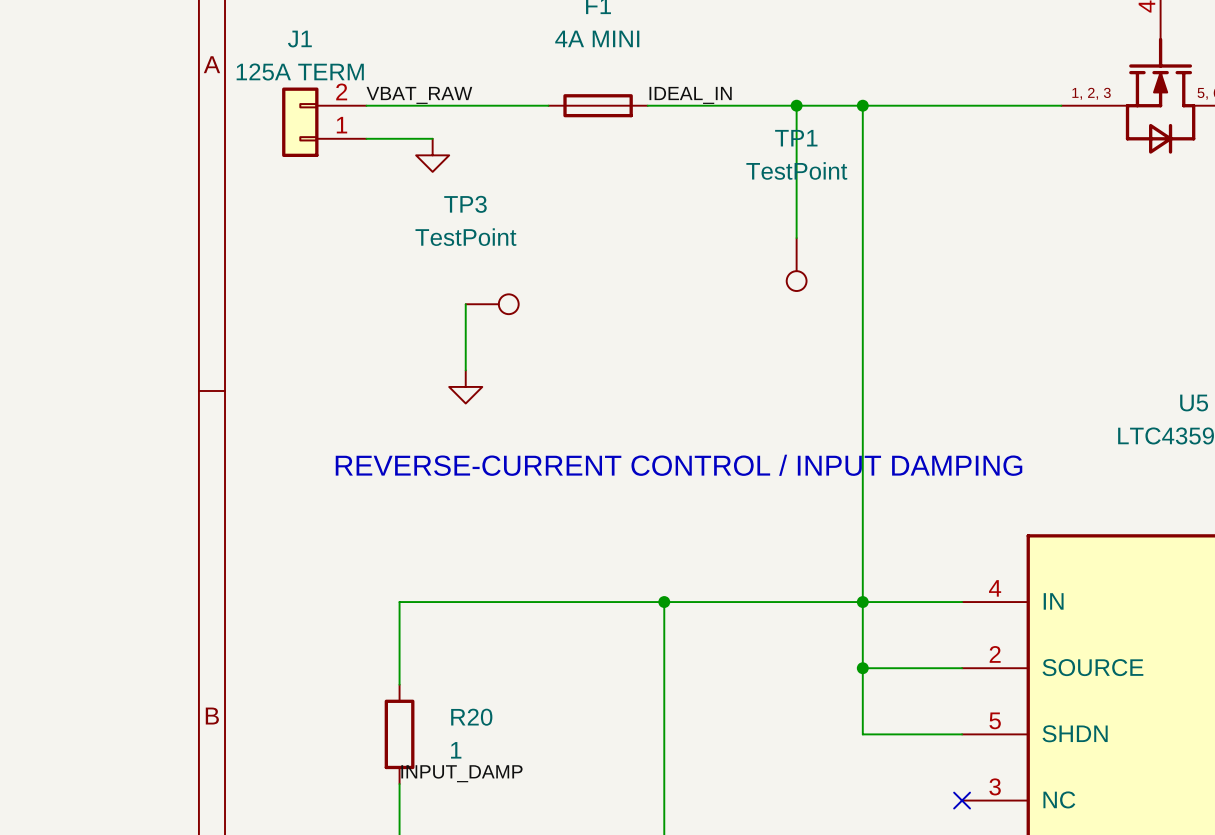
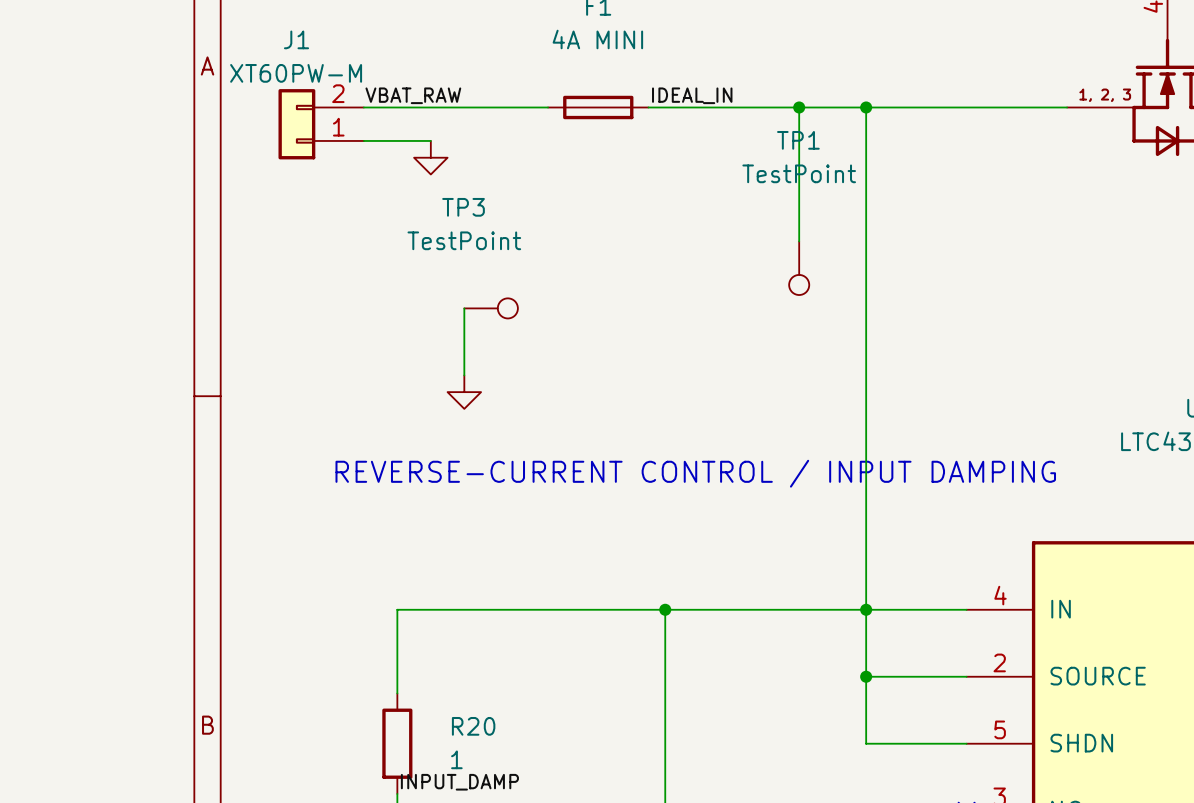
J1 value: 125A TERM (300, 72) -> XT60PW-M (296, 73)

